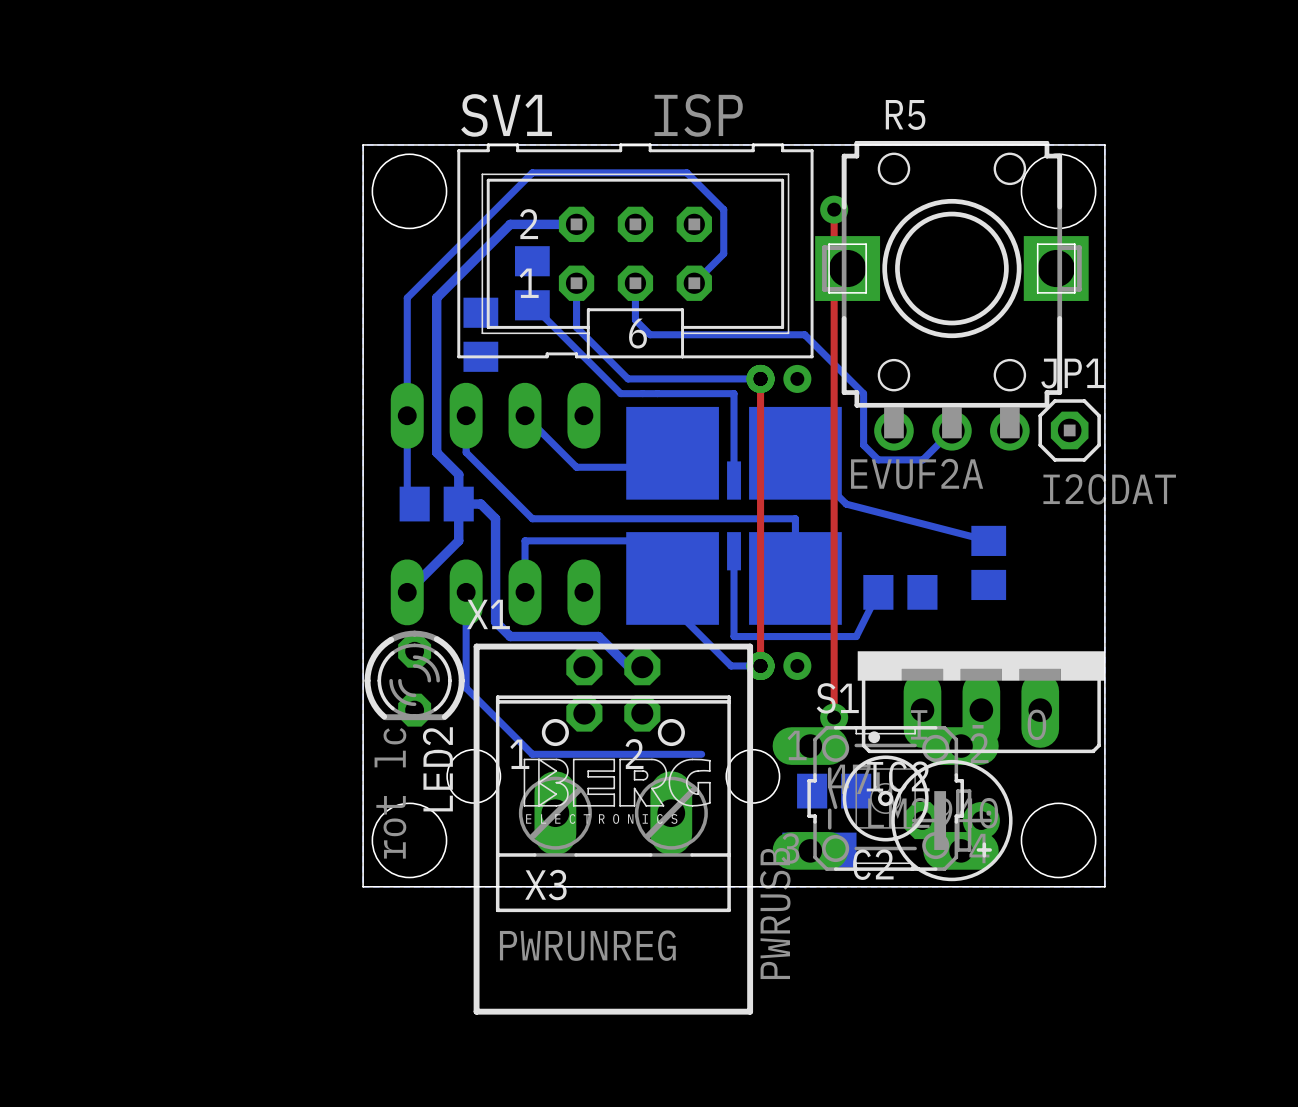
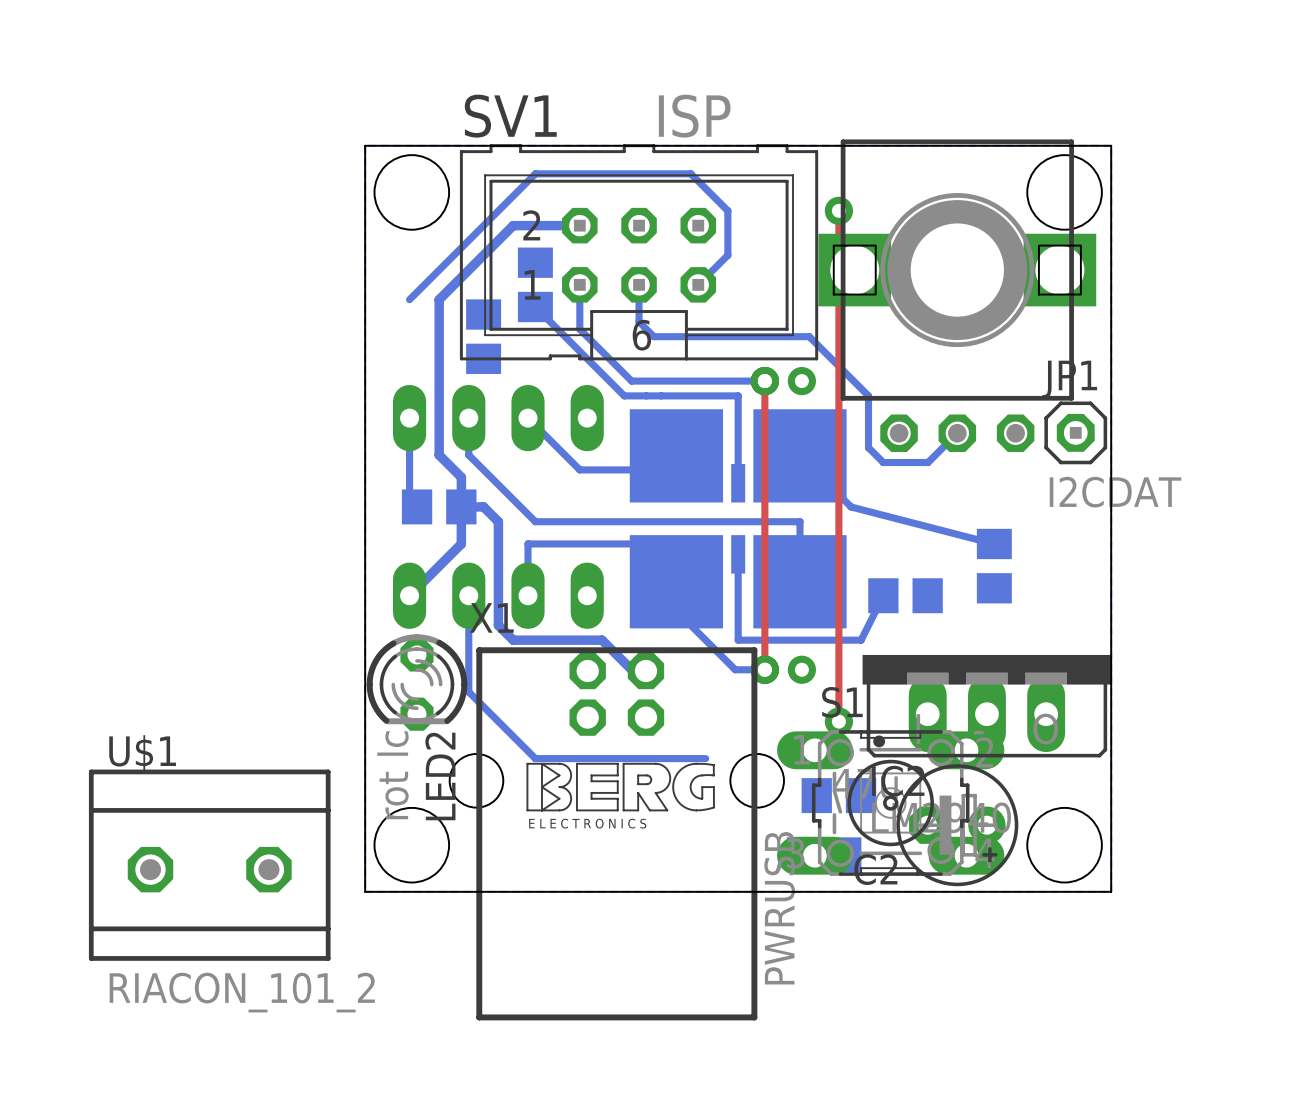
part: none -> (957, 295)
R5: EVUF2A (951, 295) -> none
bottom track: (407, 297) (407, 415) -> none
X3: PWRUNREG (613, 803) -> none
U$1: none -> RIACON_101_2 (209, 865)

